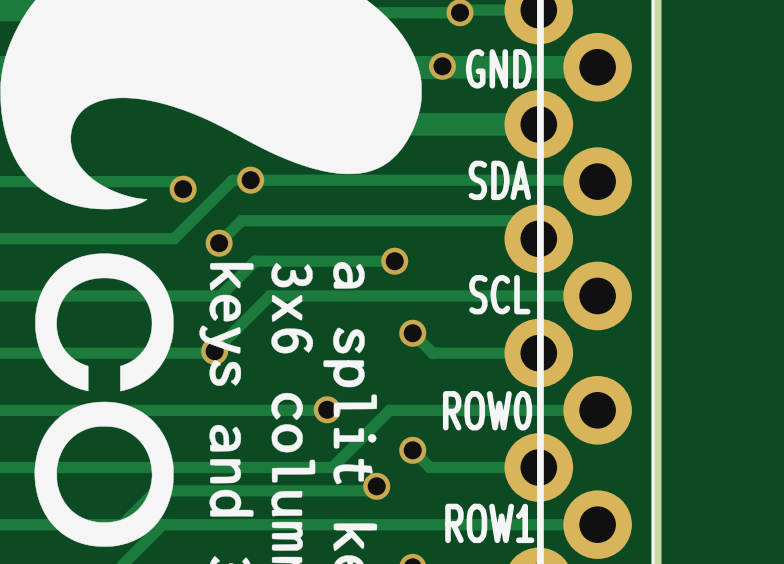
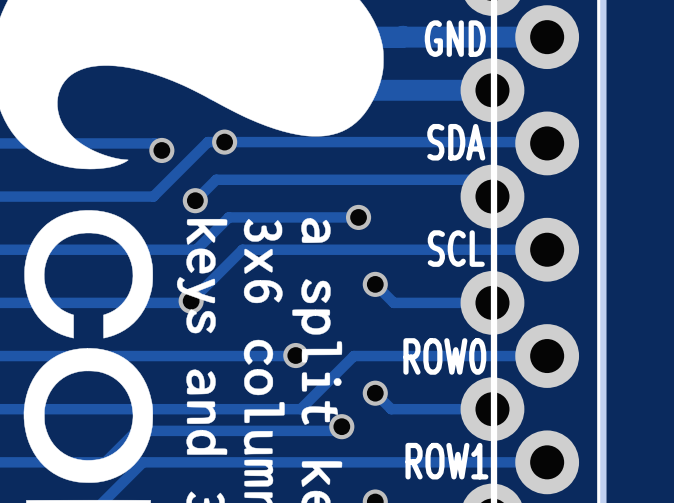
via: (442, 66) -> none

